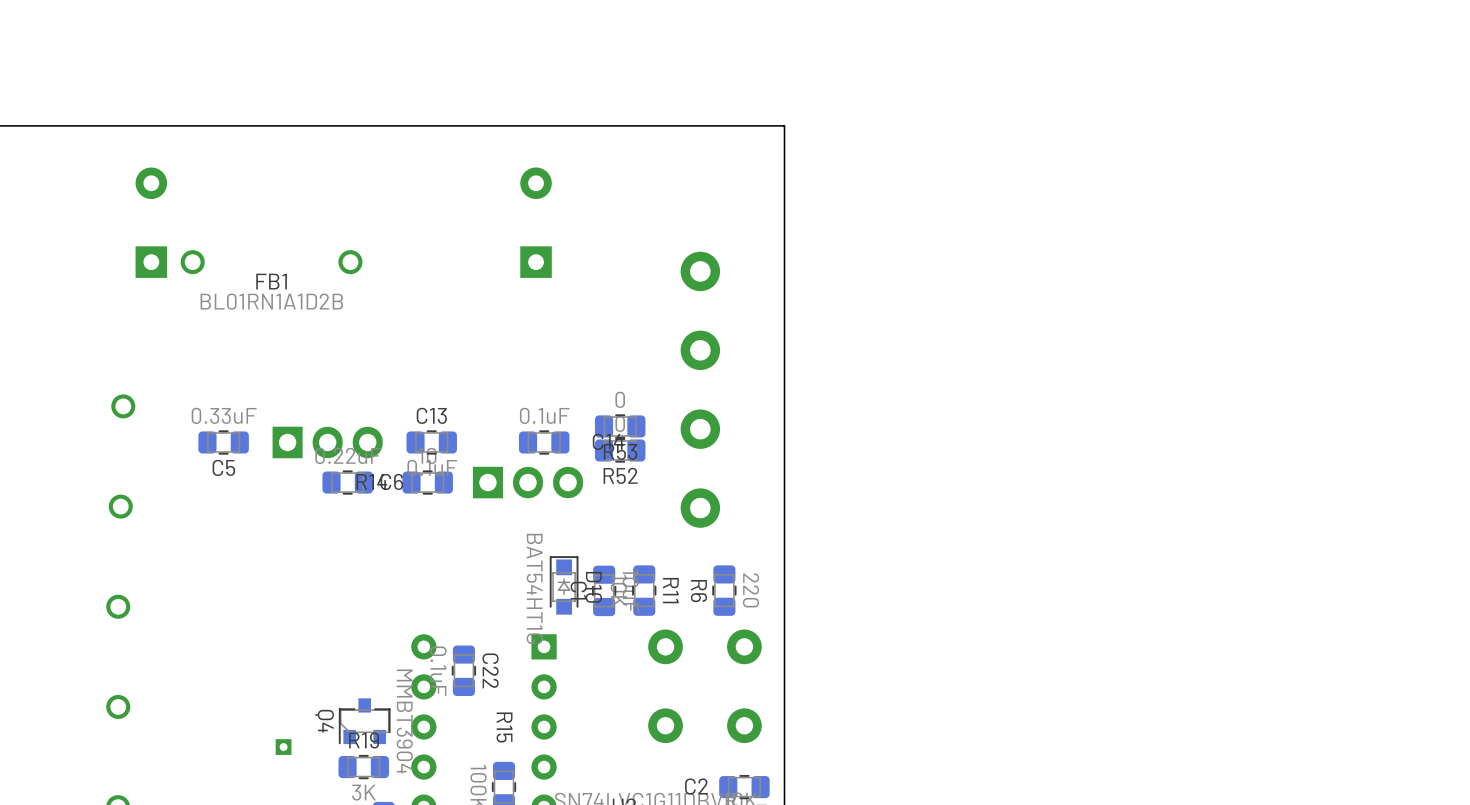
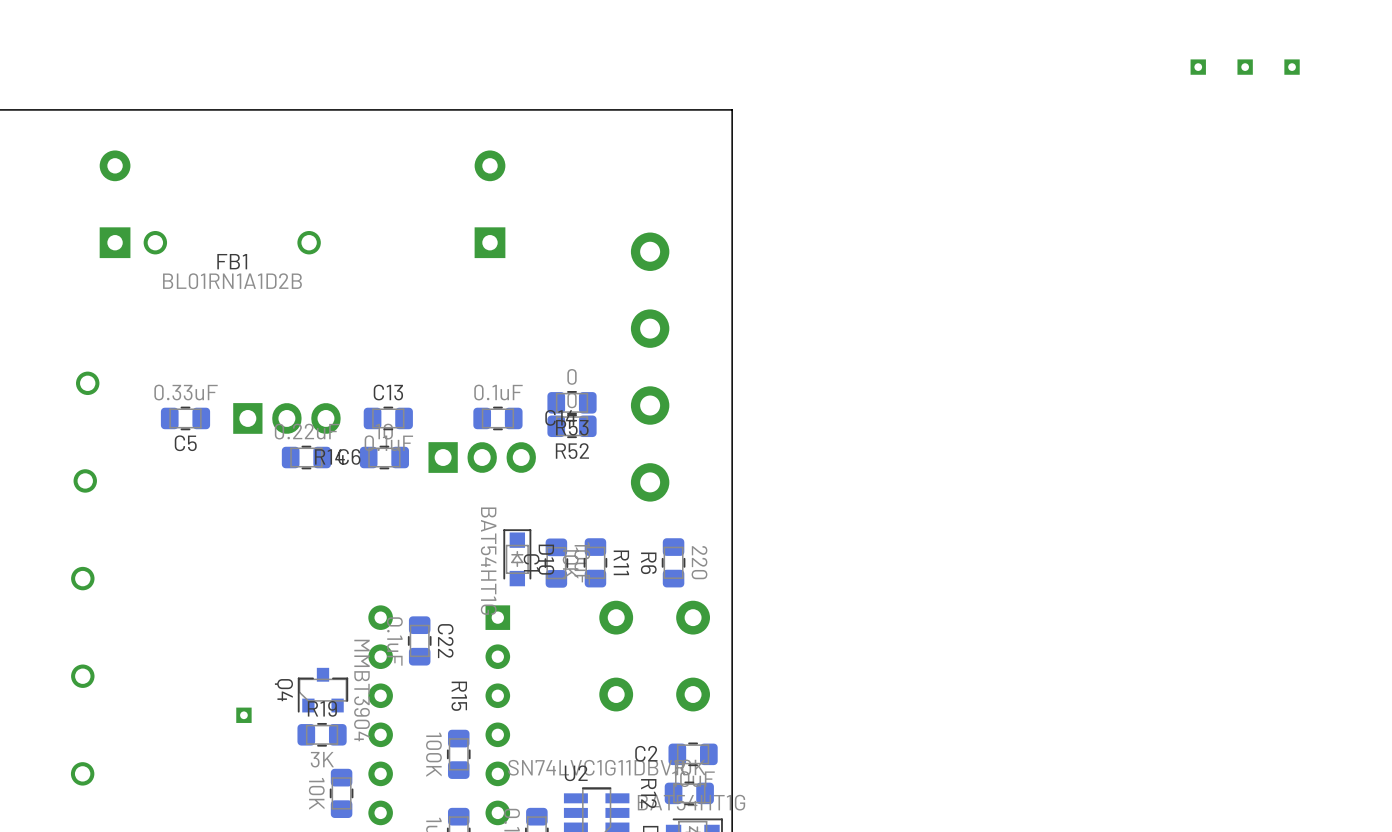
part: none -> (1198, 67)
part: none -> (1245, 67)
part: none -> (1292, 67)

